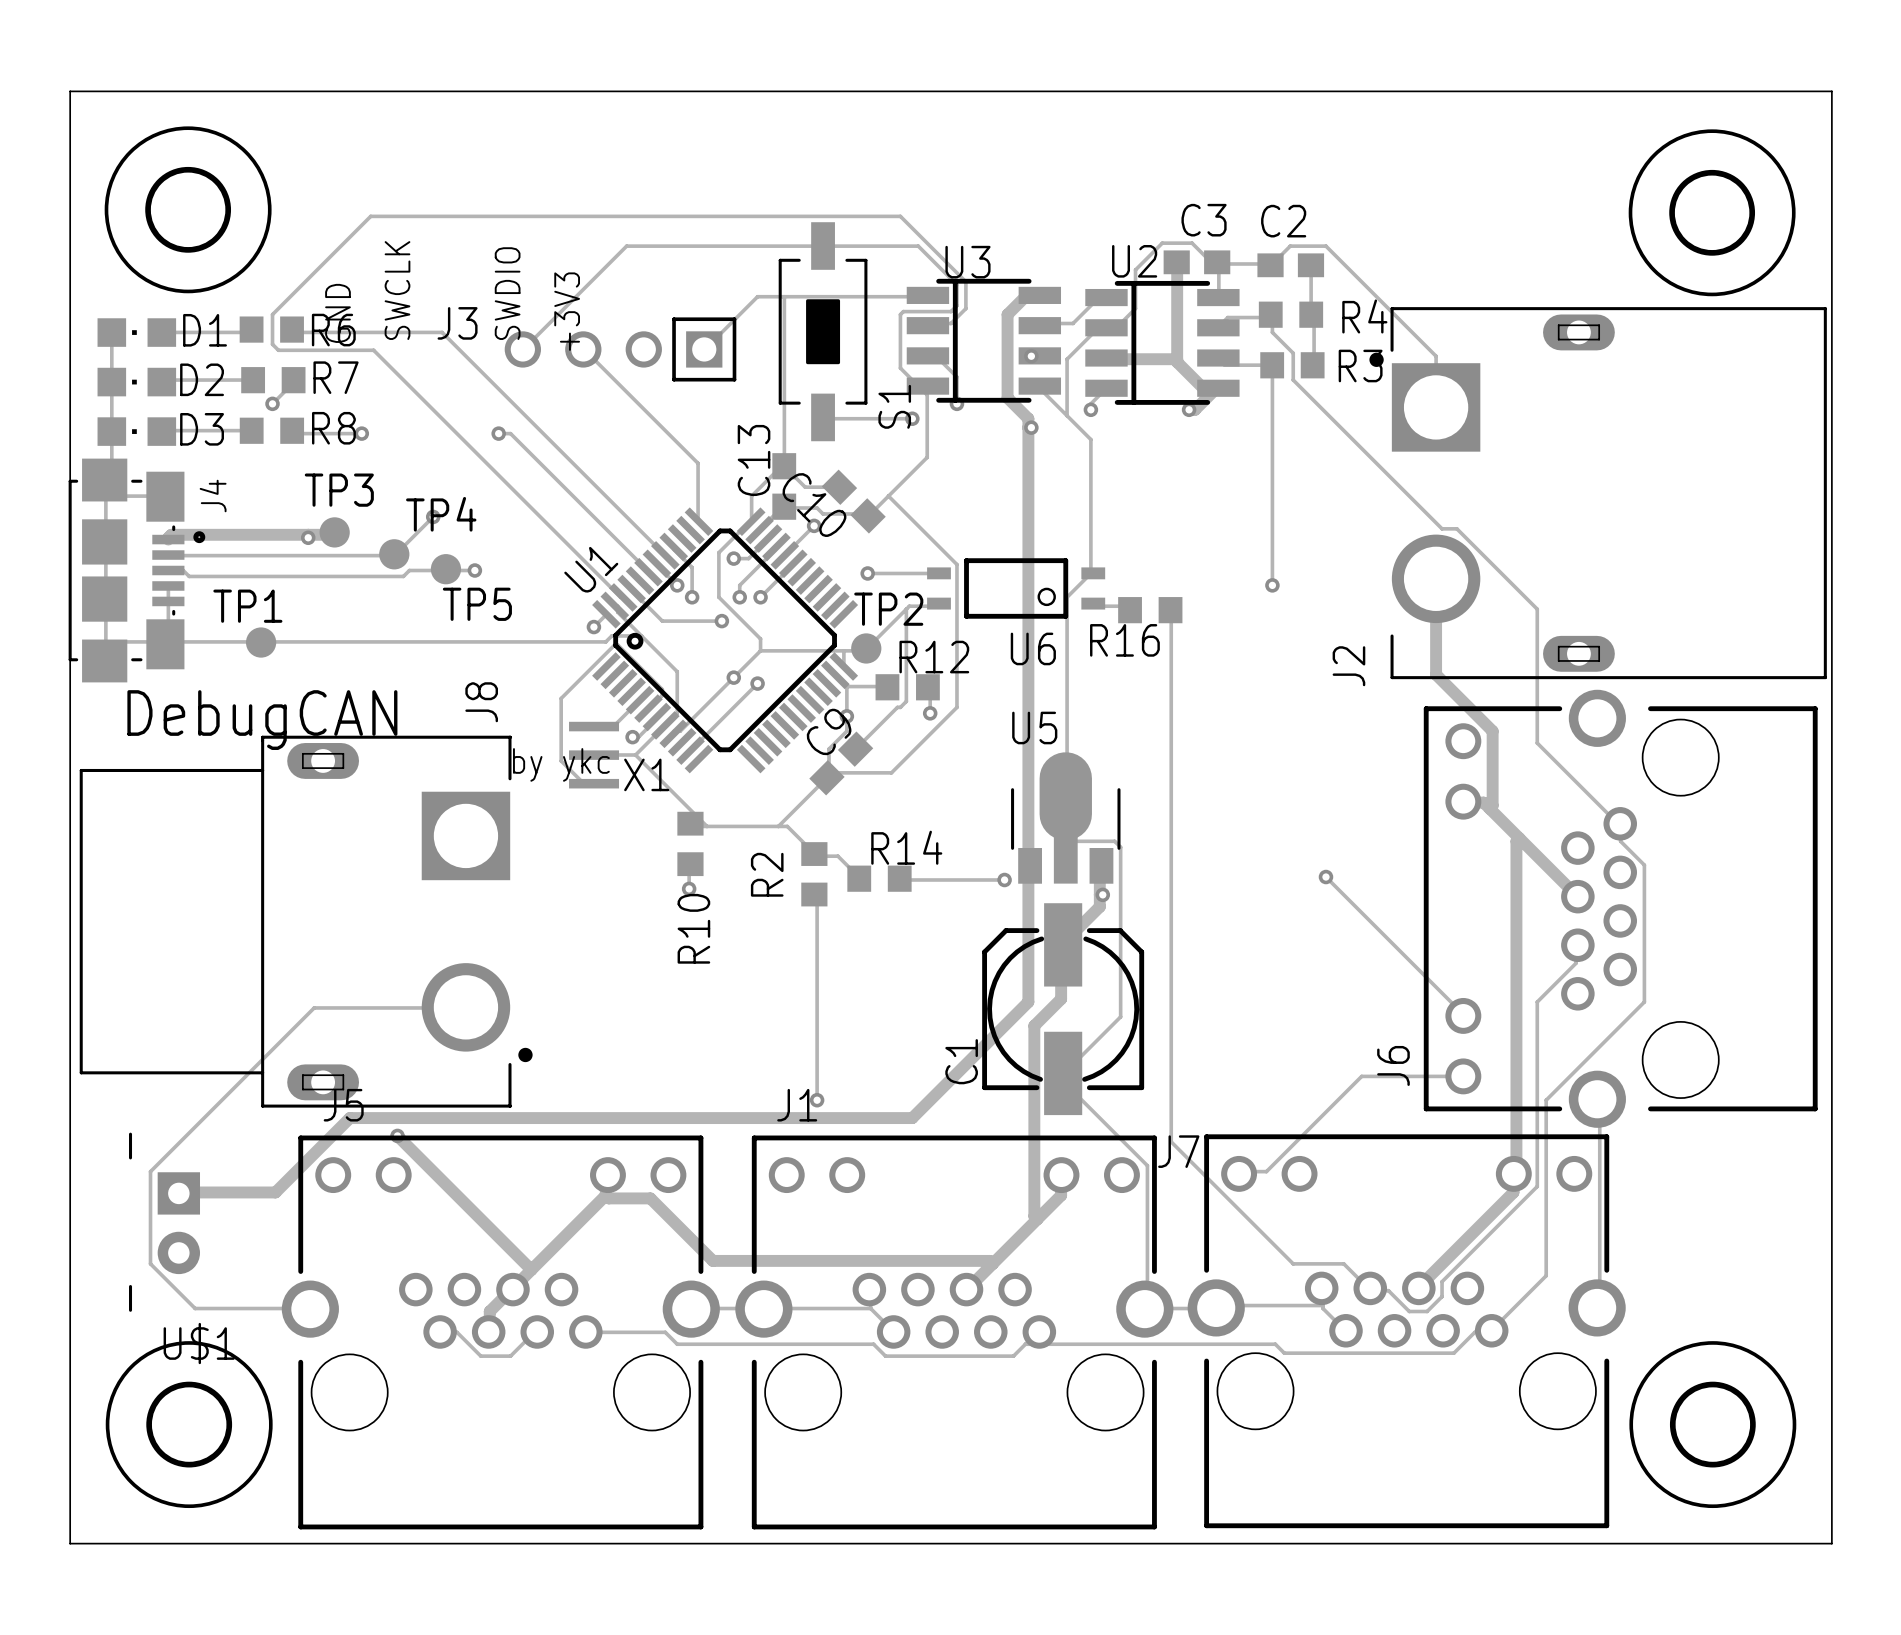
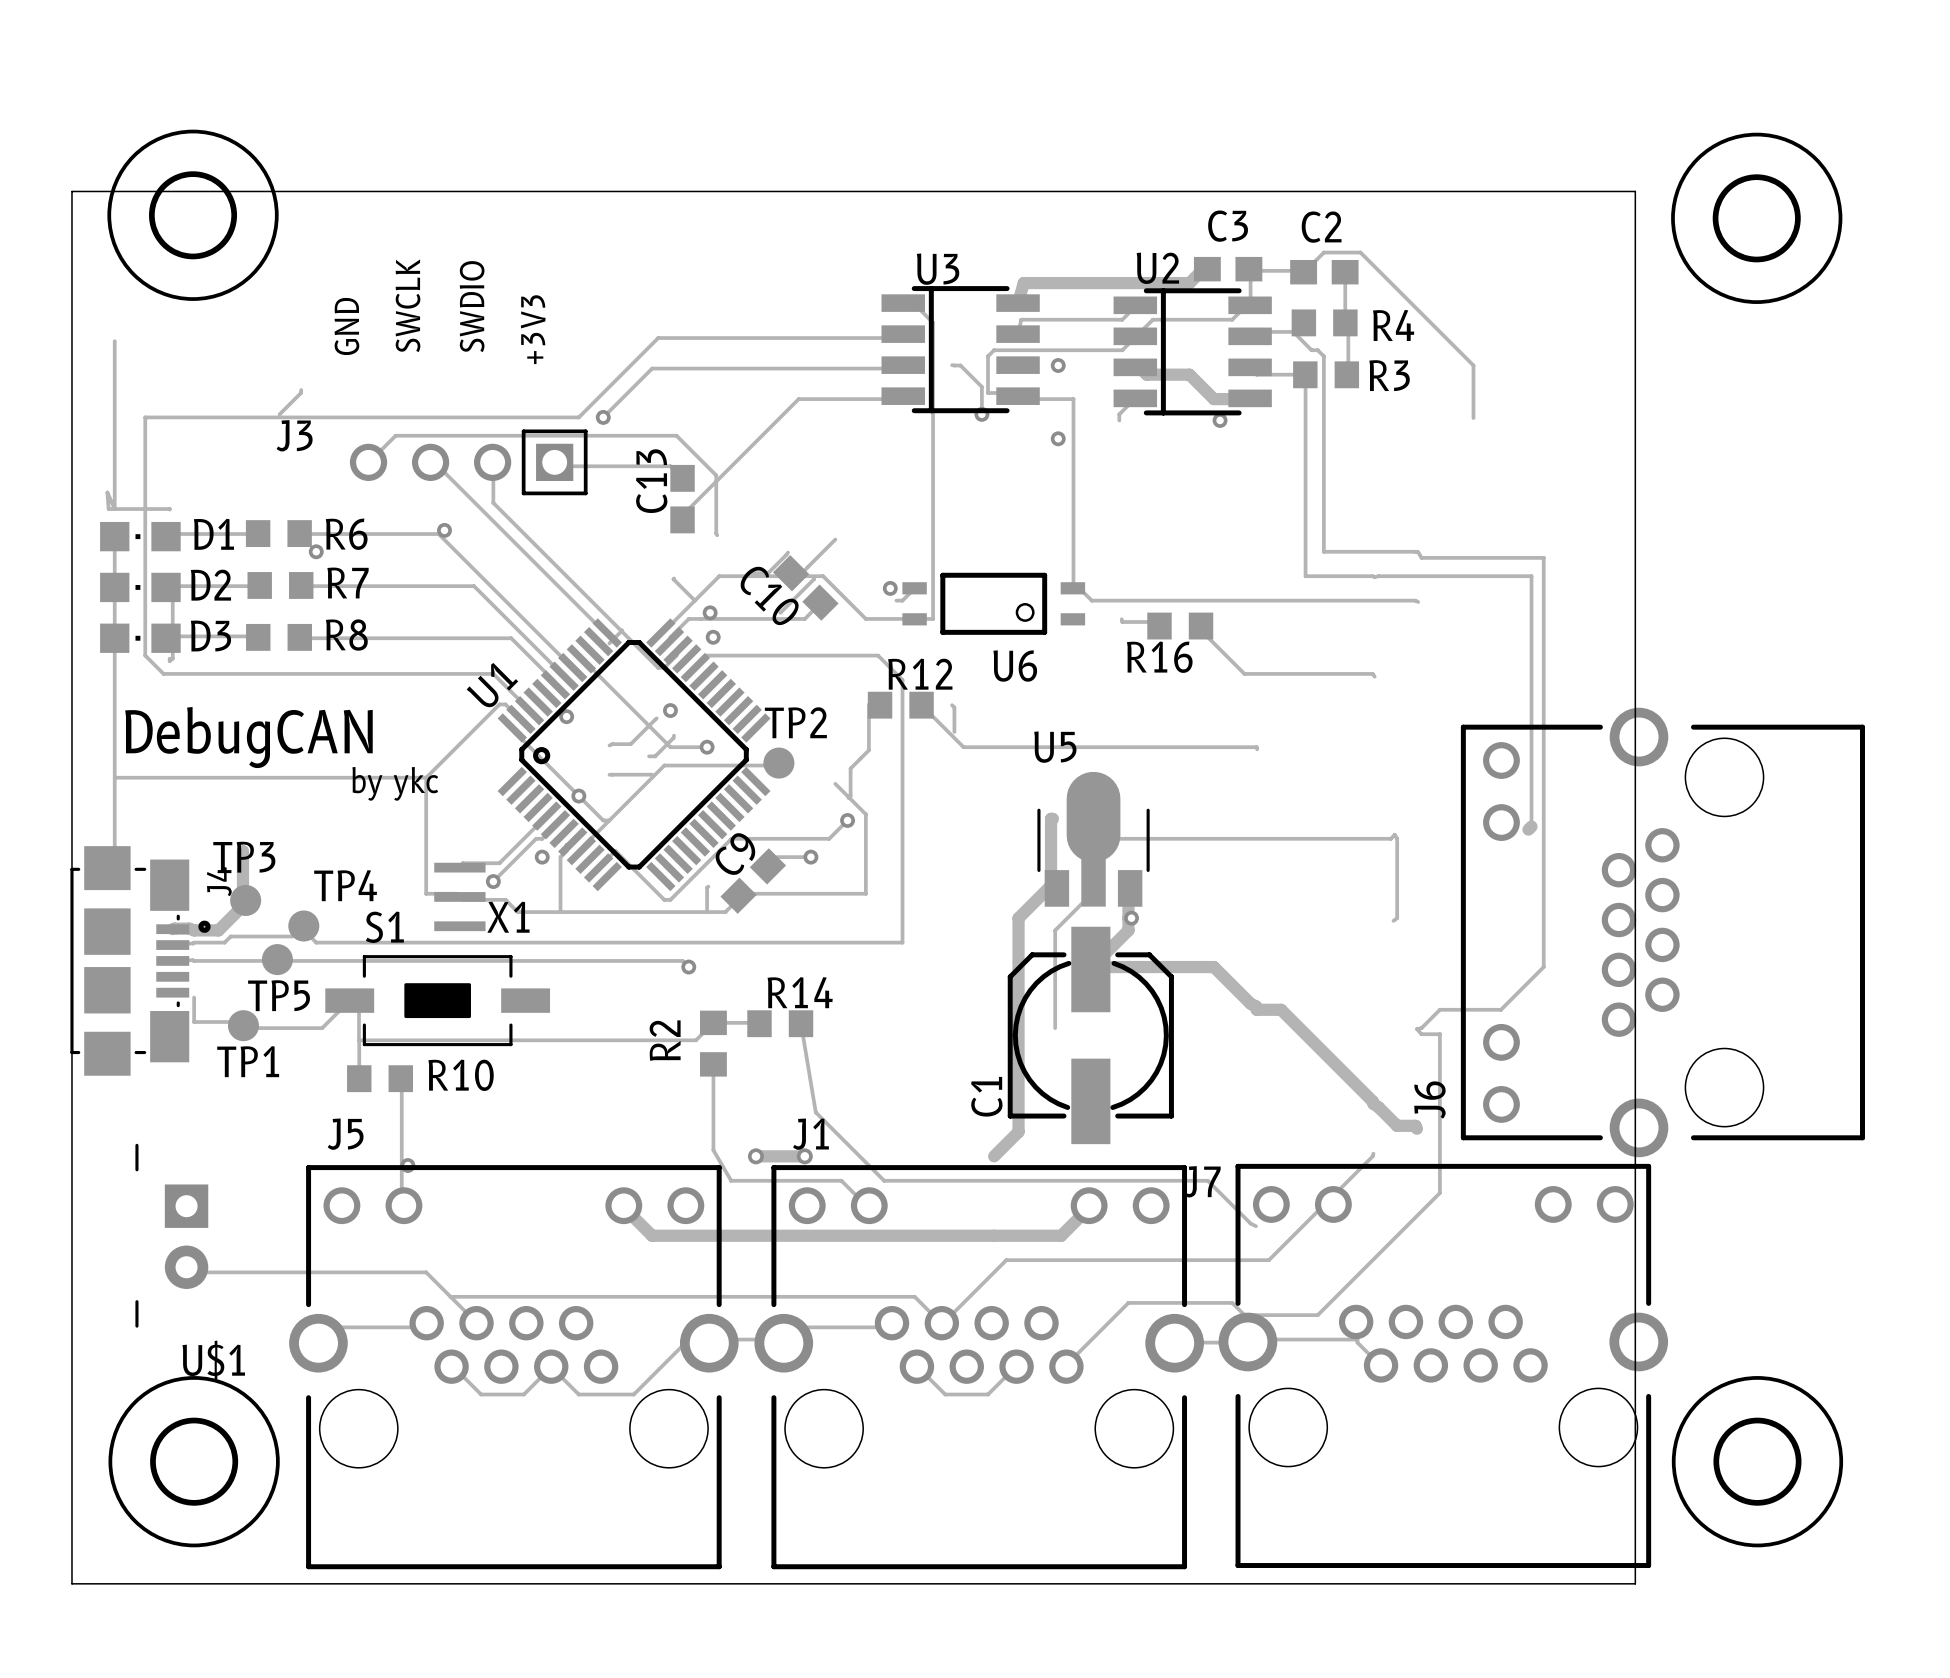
board edge: (70, 186) (70, 91) (1831, 91) (1831, 1543) (1593, 1543) -> (71, 191) (1635, 191) (1635, 1583)
track: (1176, 262) (1177, 362) (1206, 391) (1218, 388) (1195, 409) (1189, 409) -> (1207, 269) (1201, 270) (1189, 283) (1023, 283) (1018, 303)
track: (1217, 262) (1209, 261) (1192, 243) (1162, 243) (1135, 269) (1135, 308) (1117, 326) (1106, 327) -> (1250, 301) (1250, 305) (1244, 307) (1232, 319) (1152, 319) (1135, 336)
text position: SWDIO (507, 293) -> SWDIO (472, 306)
track: none -> (903, 303) (913, 303) (933, 322) (933, 618) (914, 618)
track: (927, 295) (757, 296) (704, 349) -> none
track: (1039, 295) (1025, 296) (1007, 314) (1007, 397) (1028, 418) (1028, 865) (1030, 865) (1028, 906) -> (1393, 920) (1397, 918) (1397, 838) (1394, 834) (1391, 838) (1097, 838) (1093, 817) (1097, 820) (1097, 881) (1093, 882) (1097, 887) (1055, 930)
track: (784, 296) (784, 466) -> none
track: (1105, 299) (1096, 299) (1073, 323) (1040, 323) (1039, 325) -> (1134, 307) (1122, 319) (1021, 319) (1018, 334)
text position: +3V3 (567, 311) -> +3V3 (533, 329)
track: none -> (903, 334) (902, 338) (658, 338) (578, 417) (145, 417) (145, 655) (163, 673) (493, 673) (529, 710)
track: (927, 325) (930, 323) (951, 323) (965, 308) (965, 281) (900, 216) (370, 216) (272, 314) (272, 344) (278, 350) (373, 350) (620, 597) (623, 597) -> none
track: (1218, 327) (1227, 317) (1269, 317) (1270, 314) (1272, 332) (1293, 353) (1293, 380) (1442, 528) (1456, 528) (1537, 609) (1537, 743) (1617, 823) (1620, 823) (1620, 841) (1644, 865) (1644, 1002) (1546, 1100) (1546, 1275) (1491, 1330) (1474, 1332) (1453, 1353) (1284, 1353) (1275, 1344) (1025, 1344) -> (1250, 336) (1250, 331) (1293, 331) (1311, 350) (1317, 350) (1323, 356) (1323, 551) (1415, 551) (1418, 552) (1421, 557) (1543, 557) (1543, 967) (1500, 1009) (1439, 1009) (1421, 1028) (1416, 1029) (1421, 1034) (1439, 1034) (1439, 1192) (1317, 1315) (1244, 1315) (1232, 1302) (1128, 1302) (1066, 1366)
track: (251, 329) (248, 332) (161, 332) -> none
R6 position: (271, 329) -> (278, 533)
track: (292, 329) (293, 332) (442, 332) (665, 555) -> none
track: (1105, 329) (1096, 329) (1067, 359) (1067, 415) -> (1134, 338) (1122, 350) (994, 350) (988, 356) (988, 393) (1012, 393) (1018, 396) (1018, 399) (1073, 399) (1072, 588) (1081, 589) (1091, 600) (1418, 601)
S1 rotation: 0° (823, 331) -> 90° clockwise (437, 1000)
S1 position: (823, 331) -> (437, 1000)
D1 position: (136, 332) -> (140, 536)
U3 position: (983, 340) -> (960, 349)
track: (522, 349) (626, 246) (918, 246) (956, 284) (956, 305) (951, 311) (903, 311) (900, 314) (900, 368) (927, 394) -> none
track: (583, 349) (659, 424) -> (368, 462) (395, 435) (676, 435)
J3 position: (620, 349) -> (468, 462)
track: none -> (903, 365) (902, 368) (652, 368) (603, 417)
track: (1106, 358) (1177, 359) -> (1135, 367) (1140, 368) (1146, 374) (1189, 374) (1213, 399) (1250, 398)
track: (253, 380) (162, 380) (161, 382) -> none
R7 position: (273, 380) -> (280, 585)
D2 position: (136, 382) -> (140, 587)
track: none -> (903, 396) (902, 399) (798, 399) (682, 515) (682, 519)
track: (927, 386) (927, 457) (870, 513) (868, 515) (867, 513) (823, 513) (817, 508) (784, 506) (759, 530) -> none
track: (1039, 386) (1040, 388) (1090, 439) (1090, 570) (1093, 573) (1090, 573) (1067, 597) (1065, 859) (1067, 841) (1114, 841) (1120, 847) (1120, 1016) (1064, 1073) (1064, 1082) (1147, 1165) (1147, 1308) -> none
via: (272, 403) -> none
S1 name position: S1 (894, 406) -> S1 (384, 927)
via: (1090, 409) -> none
track: (823, 417) (912, 418) -> none
via: (912, 418) -> none
track: (251, 430) (161, 431) -> none
R8 position: (271, 430) -> (279, 637)
track: (292, 430) (293, 433) (361, 433) -> none
D3 position: (136, 431) -> (140, 638)
via: (361, 433) -> none
track: (498, 433) (510, 433) (648, 572) -> none
via position: (498, 433) -> (603, 417)
track: none -> (430, 462) (432, 466) (438, 466) (603, 631) (607, 632)
track: none -> (492, 462) (493, 502) (658, 667) (664, 667) (676, 655) (678, 650)
track: none -> (554, 462) (560, 466) (670, 466) (682, 478)
track: (784, 466) (805, 487) (839, 487) -> none
track: (784, 466) (781, 466) (751, 496) (751, 521) (718, 552) (718, 597) (760, 638) (760, 650) -> none
track: (104, 480) (104, 660) (105, 641) (605, 641) (611, 635) (641, 635) -> none
C13 position: (784, 486) -> (682, 499)
J2: (1598, 493) -> none
track: (888, 496) (956, 564) (956, 707) (891, 772) (829, 772) (826, 778) (778, 826) -> none
C10 position: (853, 501) -> (805, 587)
track: (433, 516) (394, 555) (168, 555) -> none
track: none -> (258, 534) (168, 534) (166, 536)
track: none -> (299, 533) (438, 534) (572, 667)
track: none -> (114, 536) (114, 875) (120, 875)
via: (814, 525) -> none
track: (334, 532) (332, 534) (171, 534) (168, 539) -> none
TP3 position: (334, 532) -> (245, 900)
track: (673, 546) (692, 567) (692, 597) -> none
track: (776, 546) (739, 585) (739, 597) -> none
TP4 position: (394, 554) -> (303, 926)
via: (733, 558) -> none
track: (1272, 561) (1272, 585) -> none
TP5 position: (445, 569) -> (277, 959)
J4 position: (136, 570) -> (140, 960)
track: (168, 570) (183, 570) (189, 576) (403, 576) (409, 570) (474, 570) -> none
track: none -> (259, 585) (166, 587)
track: none -> (301, 585) (474, 586) (564, 676)
via: (474, 570) -> none
track: none -> (914, 588) (902, 600) (896, 600)
track: (939, 573) (867, 573) -> none
track: (1436, 578) (1436, 674) (1492, 731) -> (1305, 576) (1531, 576) (1531, 750)
via: (677, 585) -> none
via: (1272, 585) -> none
track: none -> (820, 602) (804, 618) (688, 618) (670, 637) (669, 641)
U6 position: (1016, 588) -> (993, 603)
track: (631, 589) (662, 621) (721, 621) -> none
via: (739, 597) -> none
via: (760, 597) -> none
track: none -> (914, 619) (865, 618) (823, 576) (792, 576) (791, 573) (786, 576) (719, 576) (660, 632)
track: (939, 603) (936, 606) (909, 606) (864, 650) (760, 650) -> none
TP5 name position: TP5 (477, 604) -> TP5 (279, 995)
track: (614, 605) (617, 606) (617, 612) (677, 671) (677, 713) (665, 725) -> none
TP1 name position: TP1 (247, 606) -> TP1 (248, 1061)
track: (906, 609) (906, 701) (900, 707) (897, 707) (855, 749) -> none
track: (1170, 610) (1171, 1141) (1293, 1263) (1343, 1263) (1370, 1290) (1388, 1290) (1409, 1311) (1427, 1311) (1442, 1296) (1442, 1281) (1537, 1186) (1537, 1002) (1575, 963) (1575, 945) (1577, 945) -> (1201, 626) (1201, 631) (1244, 673) (1372, 673) (1374, 676)
track: none -> (258, 637) (166, 636) (166, 638)
track: none -> (299, 637) (511, 638) (554, 681) (555, 684)
via: none -> (713, 637)
via: (721, 621) -> none
via: (593, 627) -> none
U1 position: (725, 640) -> (634, 754)
TP1 position: (261, 642) -> (243, 1025)
track: none -> (581, 658) (670, 747) (707, 747)
TP2 position: (866, 648) -> (778, 763)
track: none -> (695, 667) (707, 655) (878, 655) (902, 680) (902, 942) (316, 942) (304, 930) (303, 926) (291, 936) (230, 936) (224, 942) (172, 945)
track: (760, 650) (680, 731) (674, 731) (673, 733) -> none
track: (843, 650) (843, 666) -> none
via: (733, 677) -> none
track: (757, 683) (690, 750) -> none
via: (757, 683) -> none
track: (846, 686) (887, 687) -> none
track: none -> (921, 705) (963, 747) (1256, 747) (1257, 749)
R12 position: (907, 687) -> (900, 705)
via: none -> (670, 710)
via: none -> (566, 716)
track: none -> (520, 719) (505, 704) (499, 704) (426, 777)
track: (648, 708) (662, 695) (662, 689) (617, 644) (614, 644) (561, 698) (561, 760) (582, 781) (593, 781) (594, 783) -> none
track: none -> (512, 727) (603, 820) (609, 820)
via: (930, 713) -> none
via: (846, 716) -> none
track: (665, 725) (635, 755) (707, 826) -> none
via: none -> (707, 747)
track width: thick (1492, 731) (1492, 805) -> thin (1531, 750) (1531, 826)
via: (632, 737) -> none
track: none -> (778, 763) (774, 765) (664, 765) (581, 850)
X1 position: (594, 755) -> (459, 896)
track: none -> (114, 777) (426, 777)
track: none -> (426, 777) (426, 893) (456, 893) (462, 899) (505, 899) (517, 912) (725, 912) (737, 899) (738, 895) (743, 893) (865, 893) (865, 814) (835, 783)
C9 position: (841, 763) -> (753, 881)
text position: by ykc (561, 764) -> by ykc (395, 783)
via: none -> (578, 796)
track: none -> (546, 816) (499, 863) (462, 863) (459, 867)
track: none -> (1052, 818) (1051, 818) (1051, 882) (1056, 888) (1049, 887) (1018, 918) (1018, 1131) (994, 1156)
track: none -> (847, 820) (829, 838) (731, 838) (670, 899) (664, 899) (615, 851) (598, 867)
via: none -> (847, 820)
track: (1463, 801) (1483, 802) (1577, 896) -> none
track: none -> (555, 824) (542, 838) (536, 838) (493, 881)
track: none -> (572, 841) (566, 844) (566, 851) (560, 857) (560, 912)
track: (690, 823) (692, 826) (787, 826) (817, 856) (837, 856) (859, 878) -> none
track: none -> (242, 851) (242, 899) (245, 900) (242, 905) (218, 930) (172, 929)
via: none -> (542, 857)
track: none -> (810, 857) (774, 857) (768, 863) (767, 866)
via: none -> (810, 857)
track: (1519, 838) (1516, 841) (1516, 1168) (1513, 1174) (1513, 1192) (1418, 1288) -> none
R10 rotation: 0° (690, 843) -> 90° clockwise (380, 1078)
R10 position: (690, 843) -> (380, 1078)
via: none -> (493, 881)
R2 position: (814, 874) -> (713, 1043)
track: (1325, 877) (1463, 1015) -> none
via: (1325, 877) -> none
R14 position: (879, 878) -> (780, 1023)
track: (899, 878) (1004, 879) -> none
via: (1004, 879) -> none
via position: (689, 888) -> (688, 967)
track: (814, 894) (817, 894) (817, 1100) -> none
track width: thick (1028, 906) (1028, 1002) -> thin (1055, 930) (1055, 1028)
J8: (306, 921) -> none
R10 name position: R10 (693, 928) -> R10 (461, 1075)
track: none -> (172, 960) (682, 960) (688, 967)
track: none -> (1091, 967) (1213, 967) (1250, 1003) (1255, 1006) (1256, 1009) (1281, 1009) (1397, 1125) (1415, 1125) (1416, 1128)
track: (1063, 944) (1061, 948) (1061, 999) (1034, 1025) (1034, 1216) (1037, 1219) -> none
track: none -> (194, 997) (194, 1022) (242, 1022) (243, 1025) (249, 1028) (322, 1028) (349, 1000) (359, 1000) (359, 1040) (695, 1040) (713, 1022) (759, 1023)
track: none -> (801, 1023) (815, 1112) (884, 1180) (1207, 1180) (1250, 1223) (1255, 1226)
track: (1028, 1002) (912, 1118) (349, 1118) (275, 1192) (178, 1193) -> none
track: (465, 1007) (314, 1007) (150, 1171) (150, 1263) (195, 1308) (310, 1309) -> (426, 1323) (426, 1327) (334, 1327) (318, 1343)
track: none -> (359, 1040) (359, 1078)
track: none -> (713, 1064) (713, 1150) (731, 1180) (841, 1180) (865, 1205) (869, 1205)
track: none -> (400, 1078) (401, 1205) (403, 1205)
track: (1463, 1076) (1361, 1076) (1266, 1171) (1239, 1171) (1239, 1173) -> none
track: (1597, 1099) (1599, 1100) (1599, 1305) (1597, 1307) -> none
via: (817, 1100) -> none
track: none -> (1373, 1153) (1268, 1260) (1006, 1260) (941, 1323) (914, 1296) (450, 1296)
track: none -> (755, 1156) (804, 1156)
via: none -> (755, 1156)
via: none -> (804, 1156)
track: (397, 1135) (531, 1269) -> none
track: (1061, 1175) (1061, 1195) (966, 1289) -> (1089, 1205) (1061, 1235) (652, 1235) (623, 1205)
track: (605, 1195) (489, 1311) (488, 1331) -> none
track: (605, 1195) (608, 1198) (650, 1198) (712, 1260) (989, 1260) (992, 1263) -> none
U$1 position: (164, 1222) -> (171, 1235)
track: none -> (186, 1267) (188, 1272) (426, 1272) (476, 1323)
track: (870, 1308) (893, 1331) -> (1016, 1366) (988, 1394) (945, 1394) (916, 1366)
track: (870, 1308) (691, 1309) -> none
track: (440, 1331) (457, 1332) (480, 1356) (510, 1356) (534, 1332) (537, 1331) -> (451, 1366) (481, 1394) (523, 1394) (551, 1366) (578, 1394) (633, 1394) (682, 1345) (707, 1345) (713, 1339) (780, 1339) (783, 1343) (798, 1327) (890, 1327) (892, 1323)
track: (585, 1331) (665, 1332) (677, 1344) (873, 1344) (885, 1356) (1013, 1356) (1039, 1331) -> none

